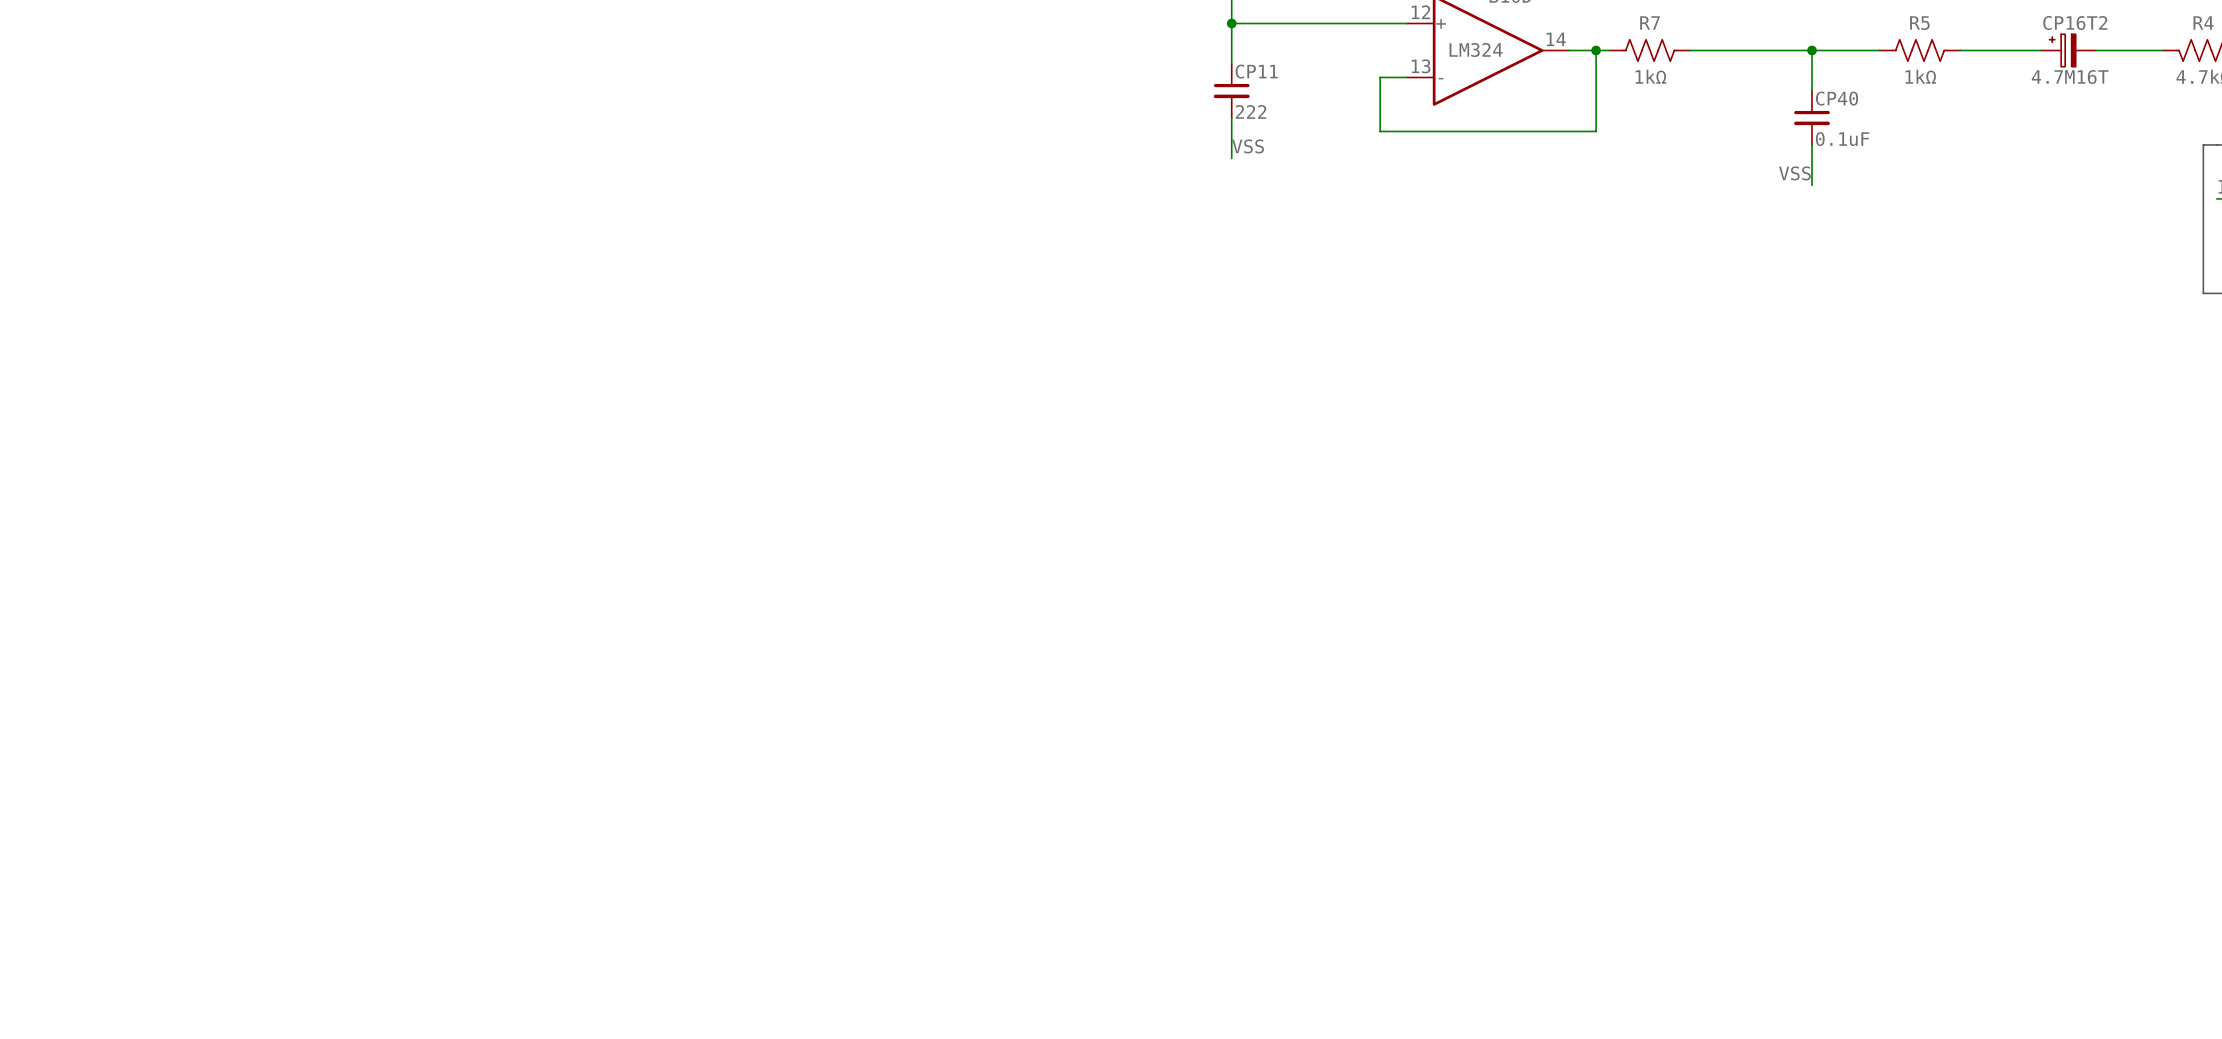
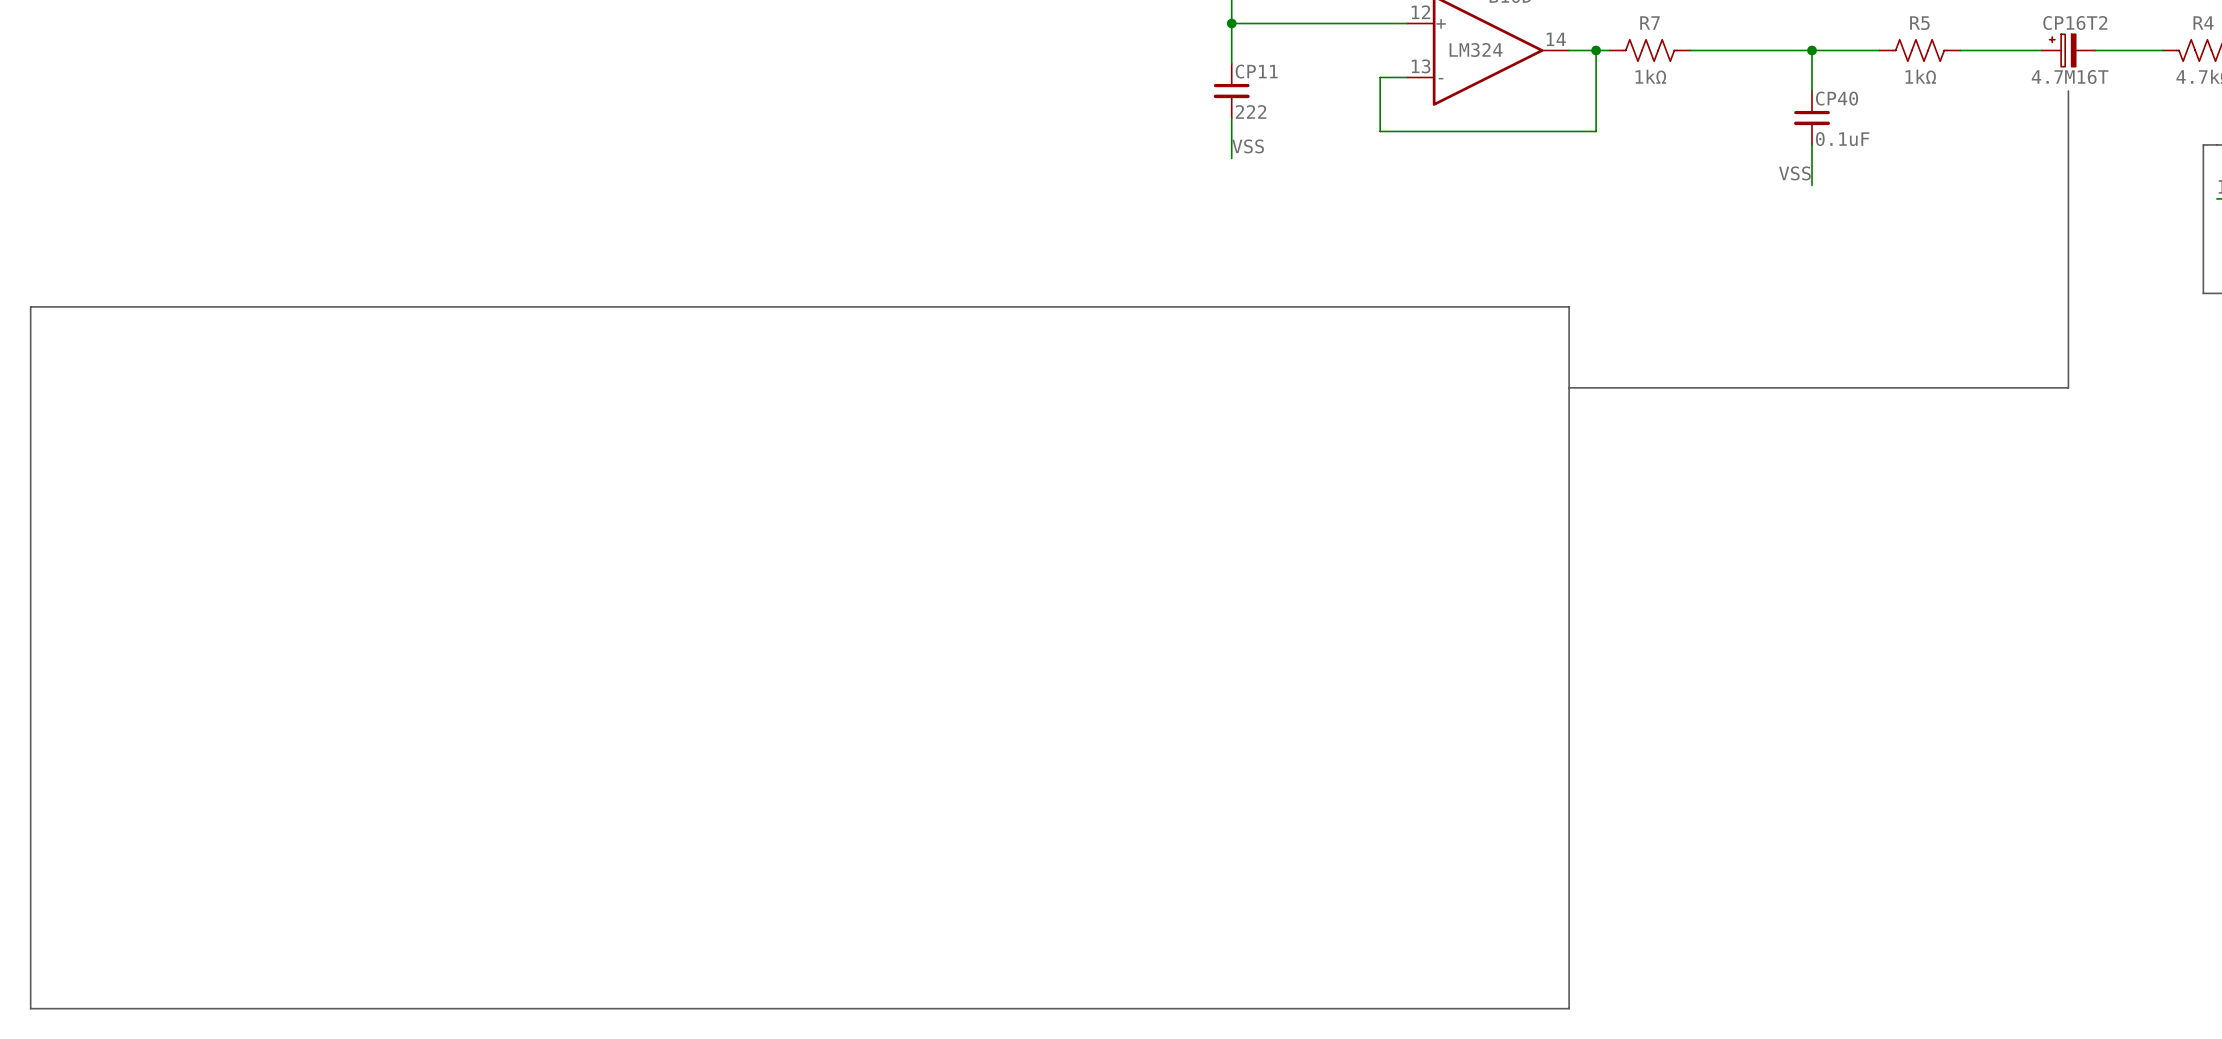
line: none -> (2068, 90) (2068, 387) (1569, 387)
line: none -> (30, 306) (1569, 306) (1569, 1008) (30, 1008) (30, 306)

